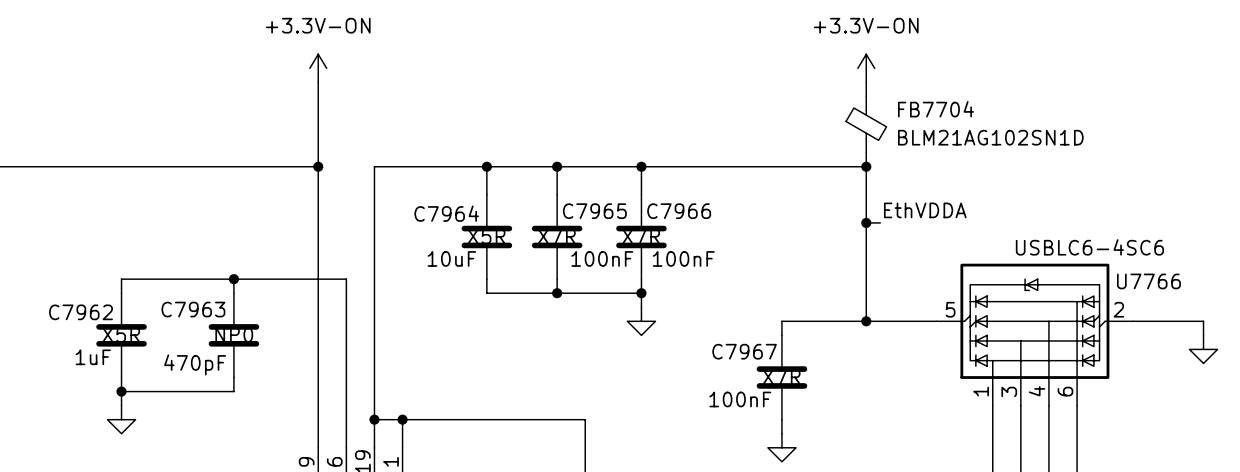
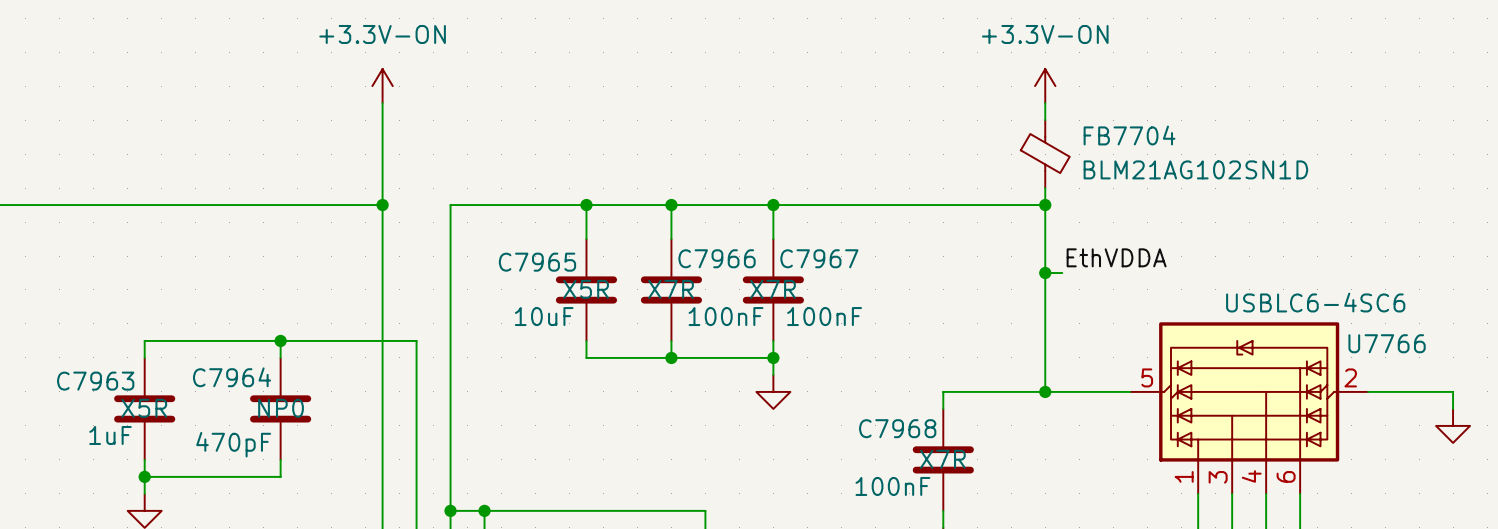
C7965 name: C7965 (594, 211) -> C7966 (717, 258)
C7966 name: C7966 (679, 211) -> C7967 (819, 258)
C7964 name: C7964 (446, 213) -> C7965 (537, 262)
C7963 name: C7963 (193, 309) -> C7964 (232, 377)
C7962 name: C7962 (81, 312) -> C7963 (95, 381)
C7967 name: C7967 (744, 351) -> C7968 (897, 428)

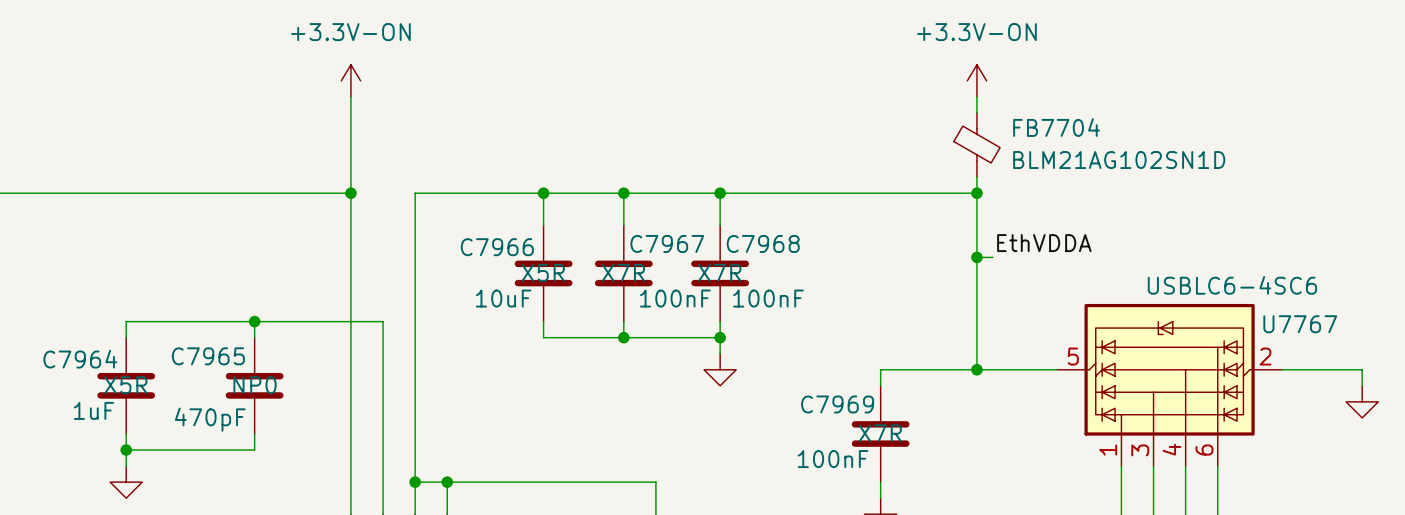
C7966 name: C7966 (717, 258) -> C7967 (667, 243)
C7967 name: C7967 (819, 258) -> C7968 (763, 243)
C7965 name: C7965 (537, 262) -> C7966 (497, 247)
U7766 name: U7766 (1387, 343) -> U7767 (1300, 324)
C7964 name: C7964 (232, 377) -> C7965 (208, 356)
C7963 name: C7963 (95, 381) -> C7964 (80, 359)
C7968 name: C7968 (897, 428) -> C7969 (837, 404)

